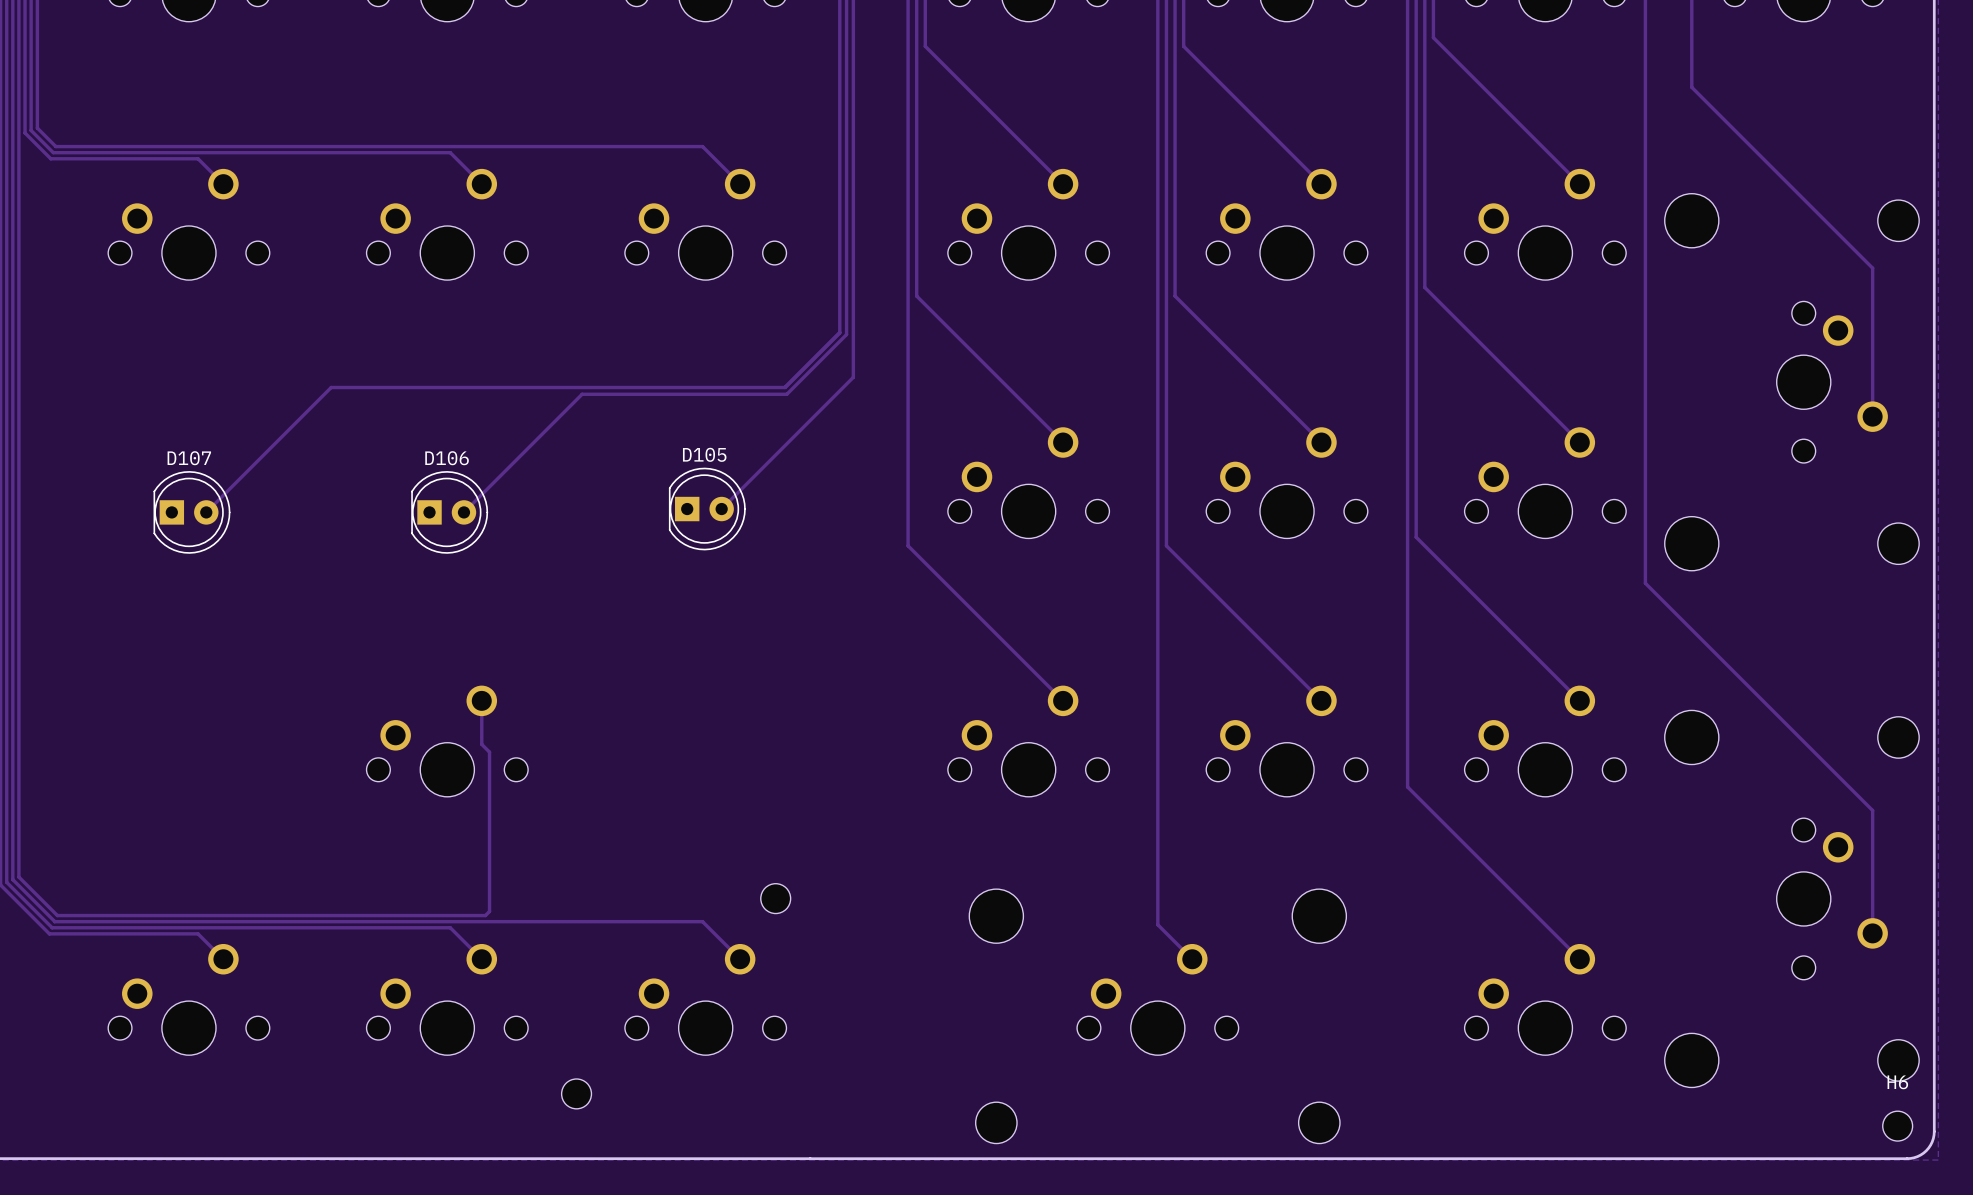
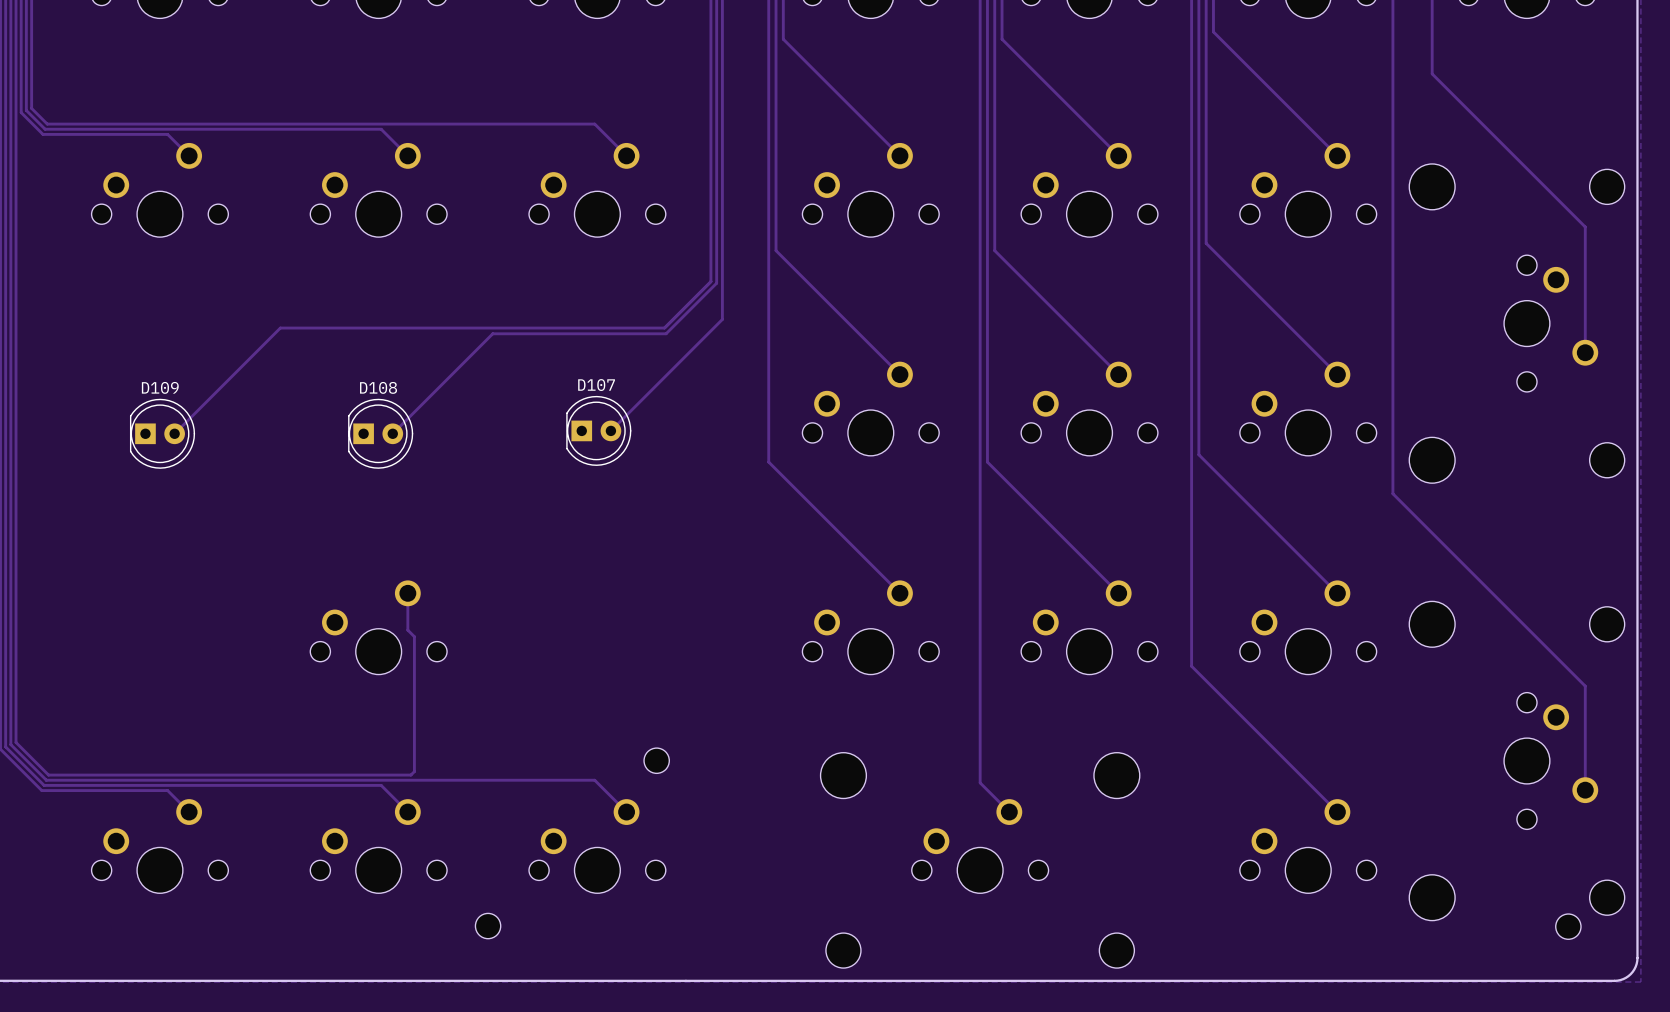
D105 name: D105 (704, 454) -> D107 (596, 385)
D107 name: D107 (189, 458) -> D109 (160, 387)
D106 name: D106 (447, 458) -> D108 (378, 387)
part: none -> (1568, 926)
H6: (1897, 1126) -> none

